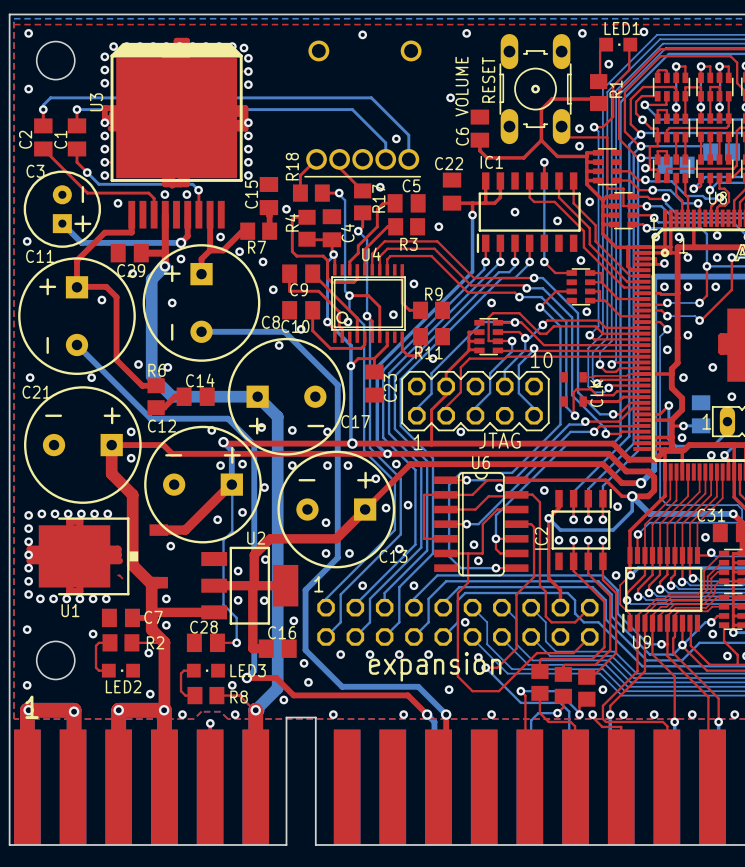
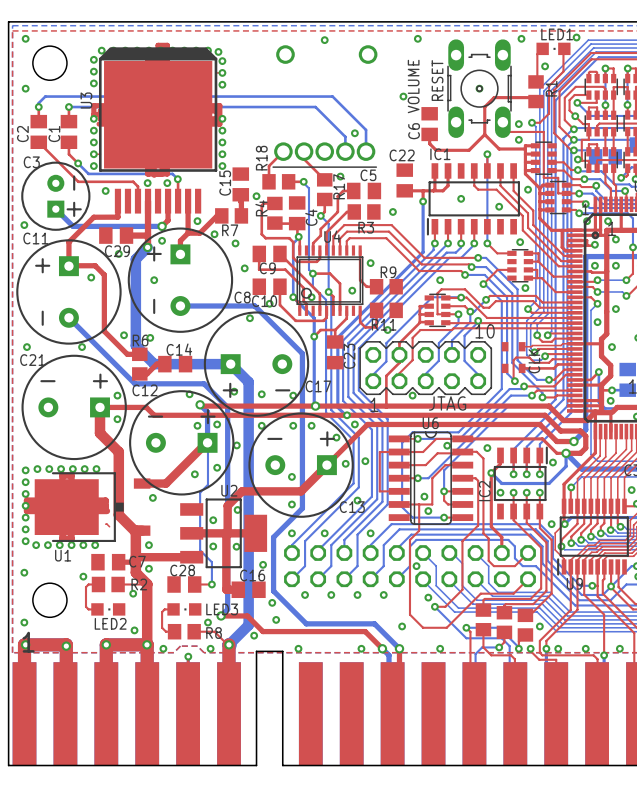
via position: (349, 553) -> (291, 533)
text: 1 (318, 584) -> none
text: expansion (435, 666) -> none

